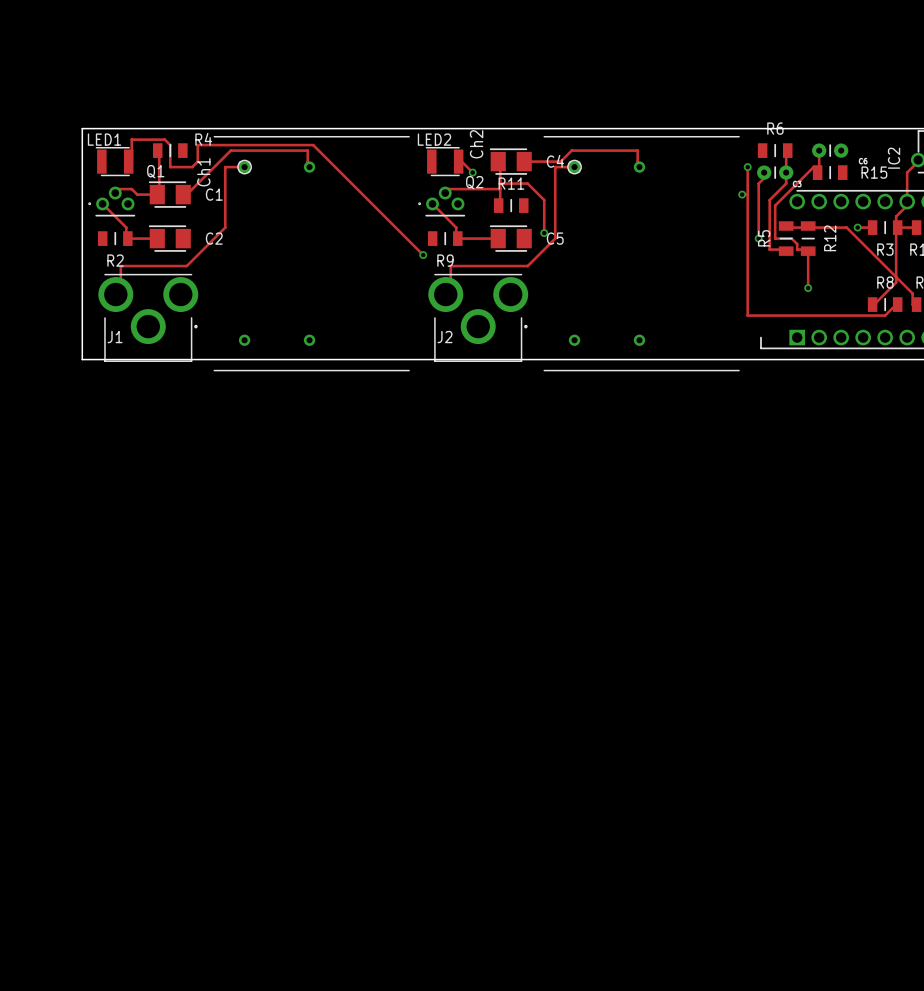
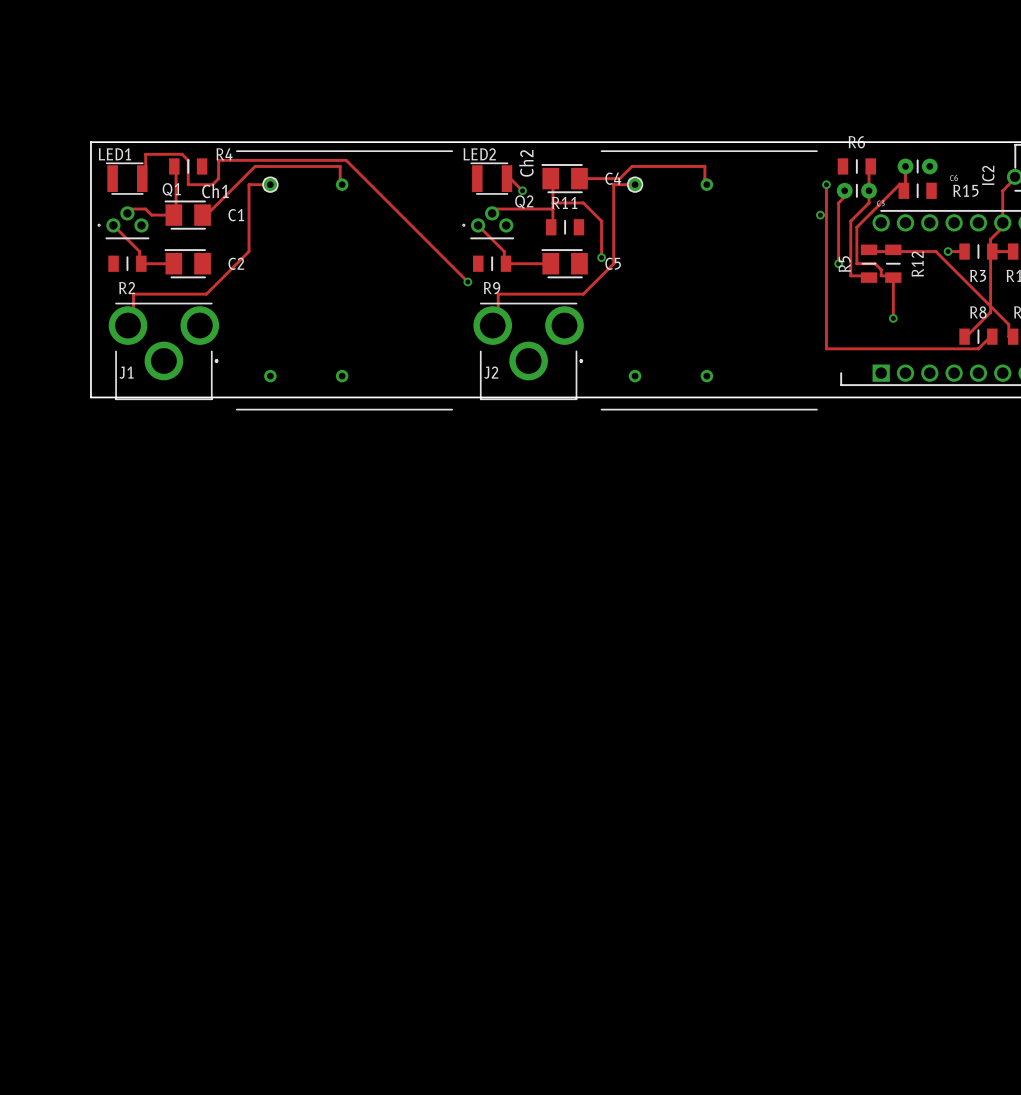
text rotation: 0° (203, 172) -> 90° clockwise (215, 191)

